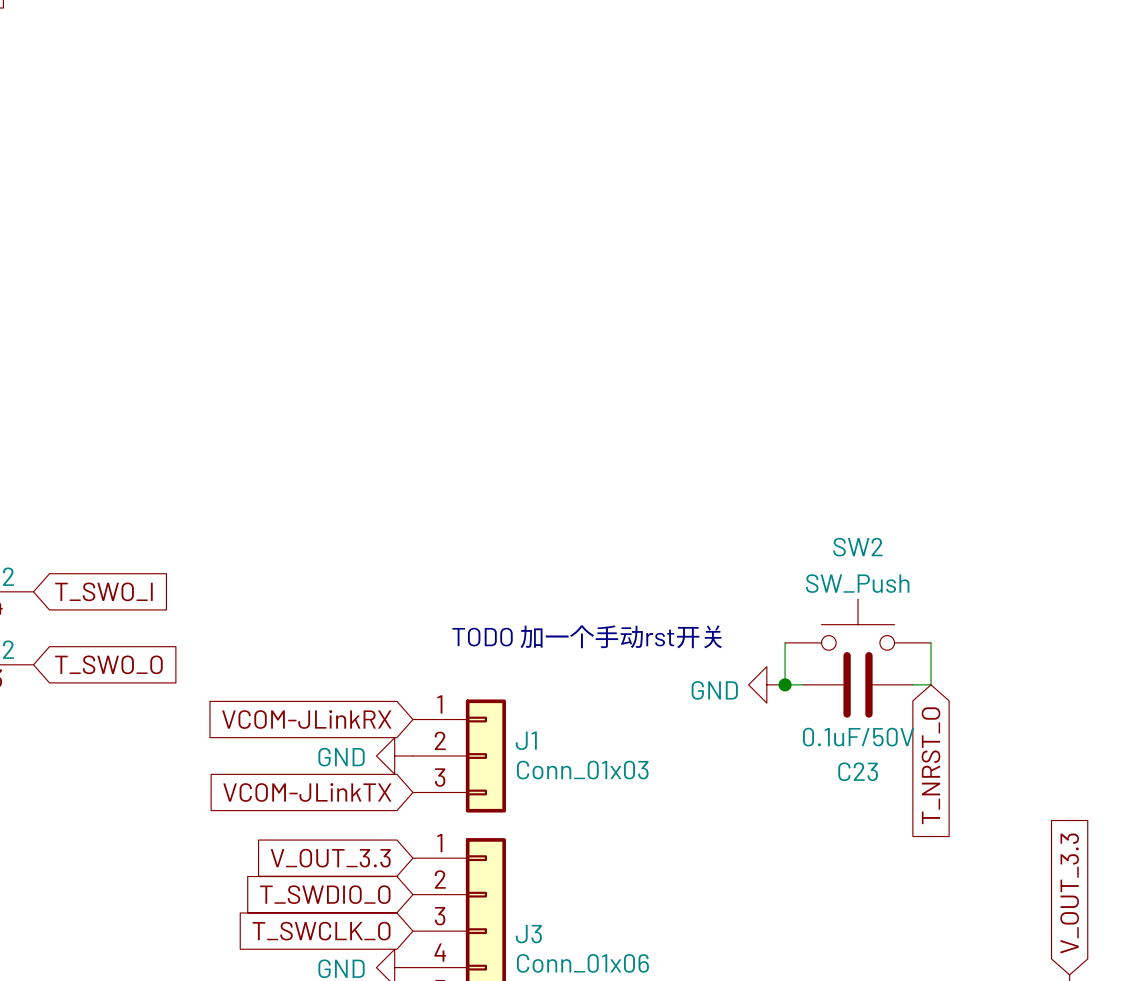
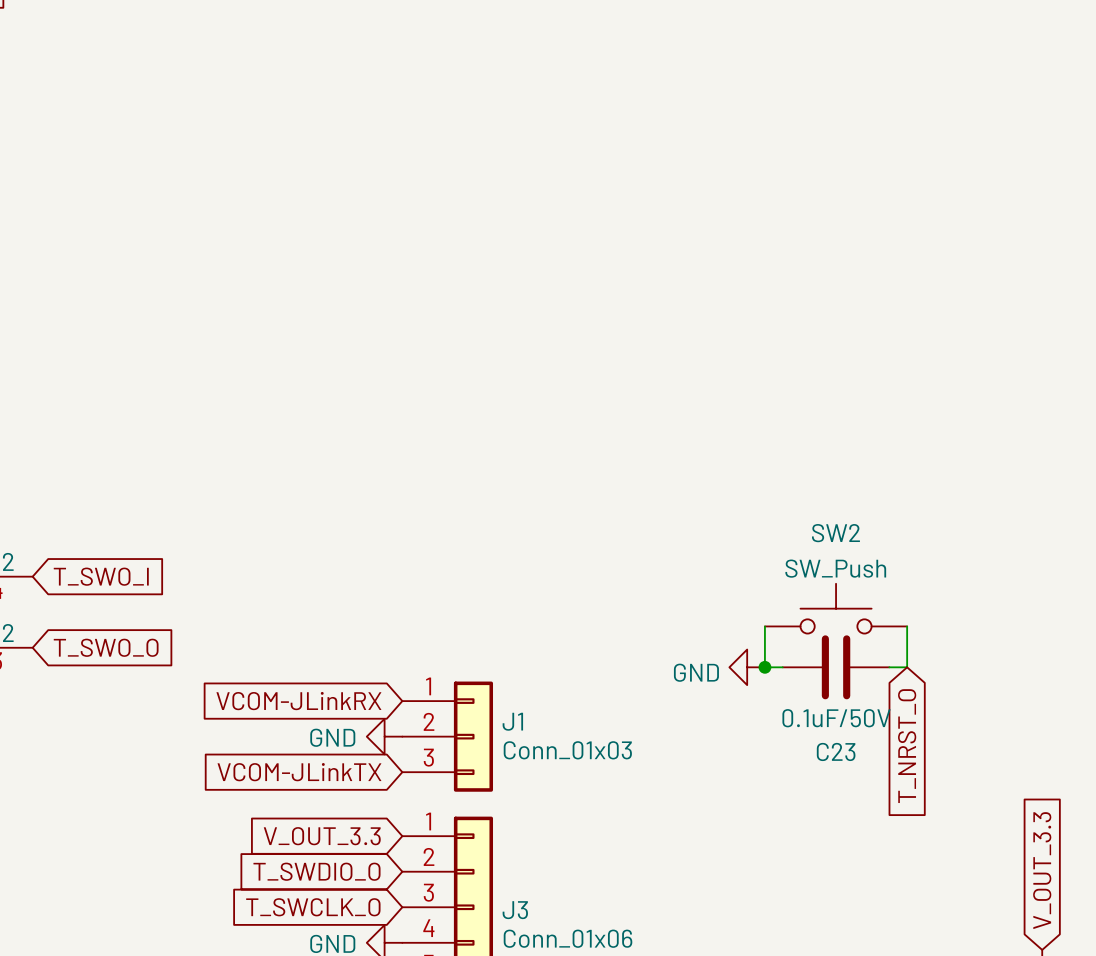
text: TODO 加一个手动rst开关 (587, 636) -> none

